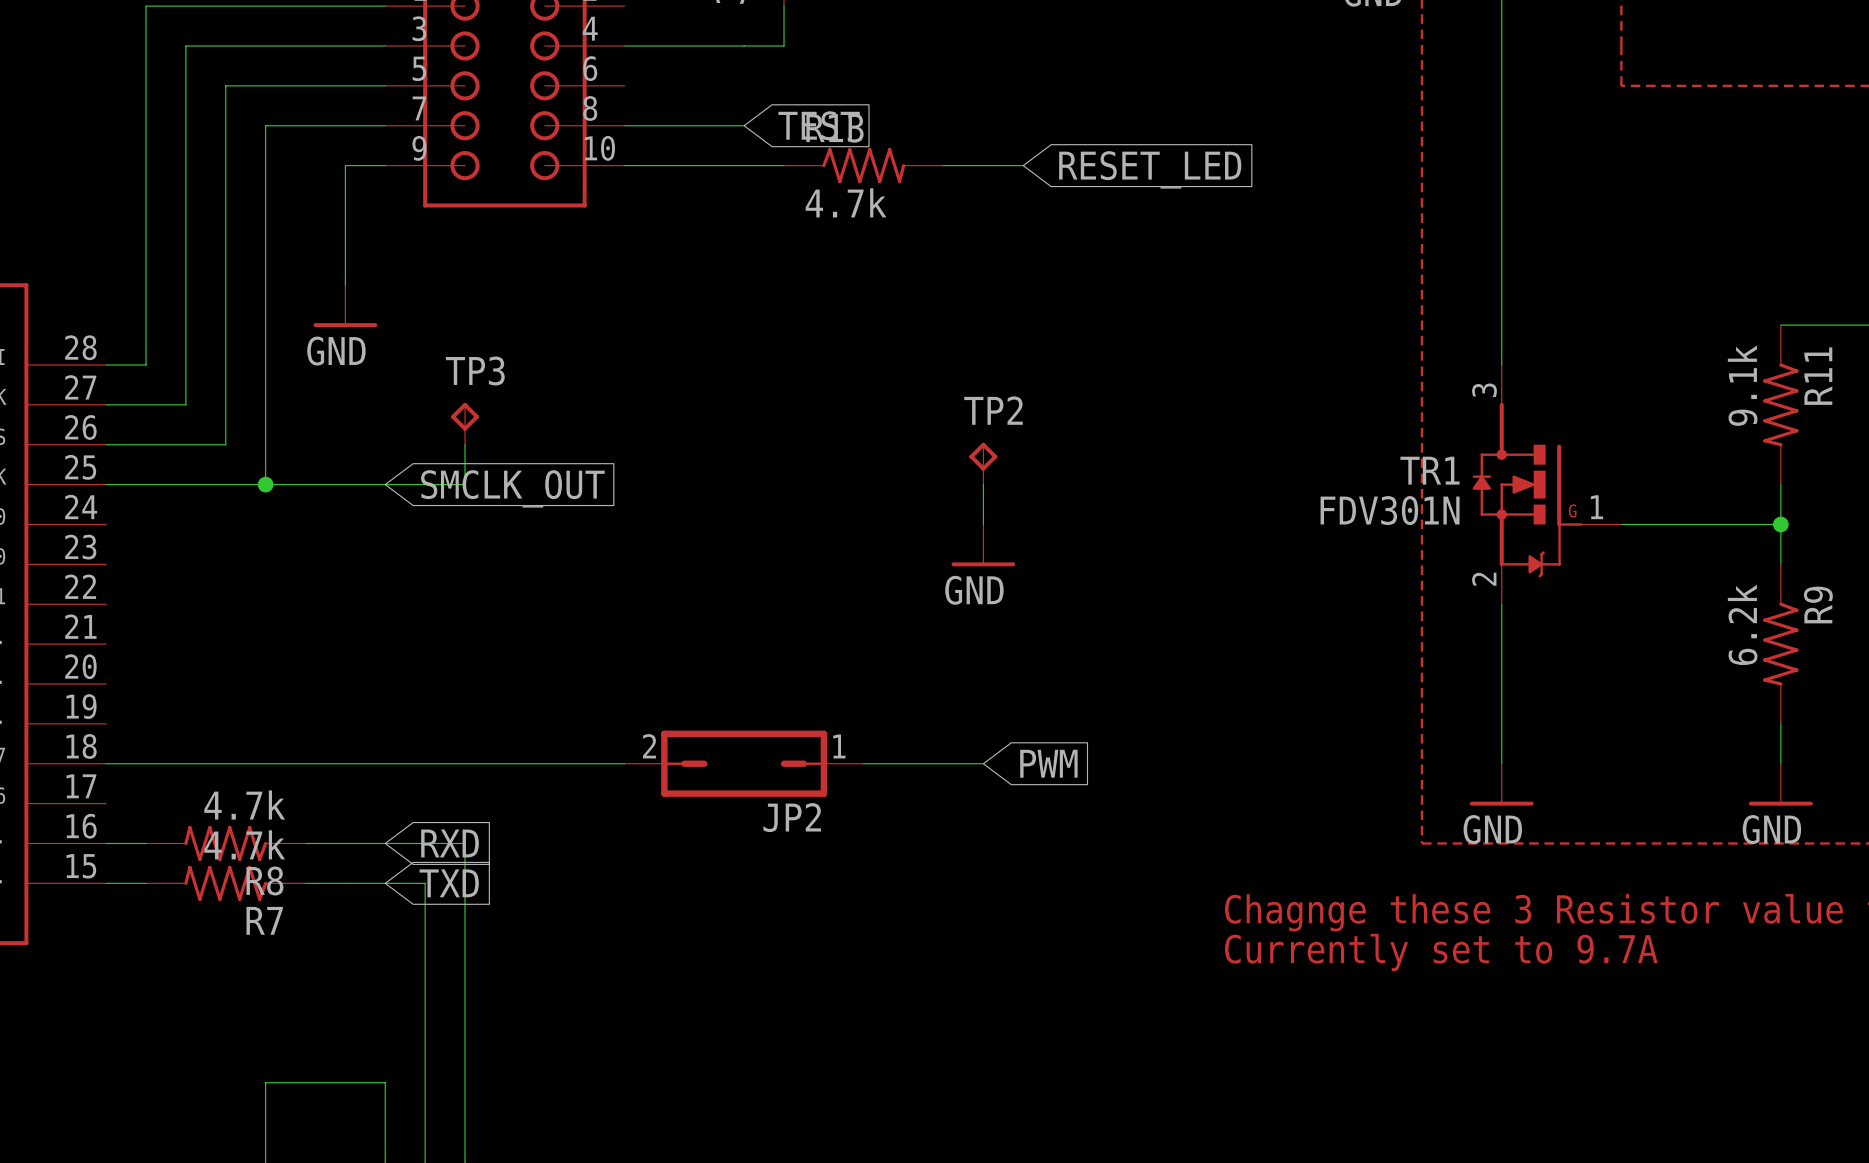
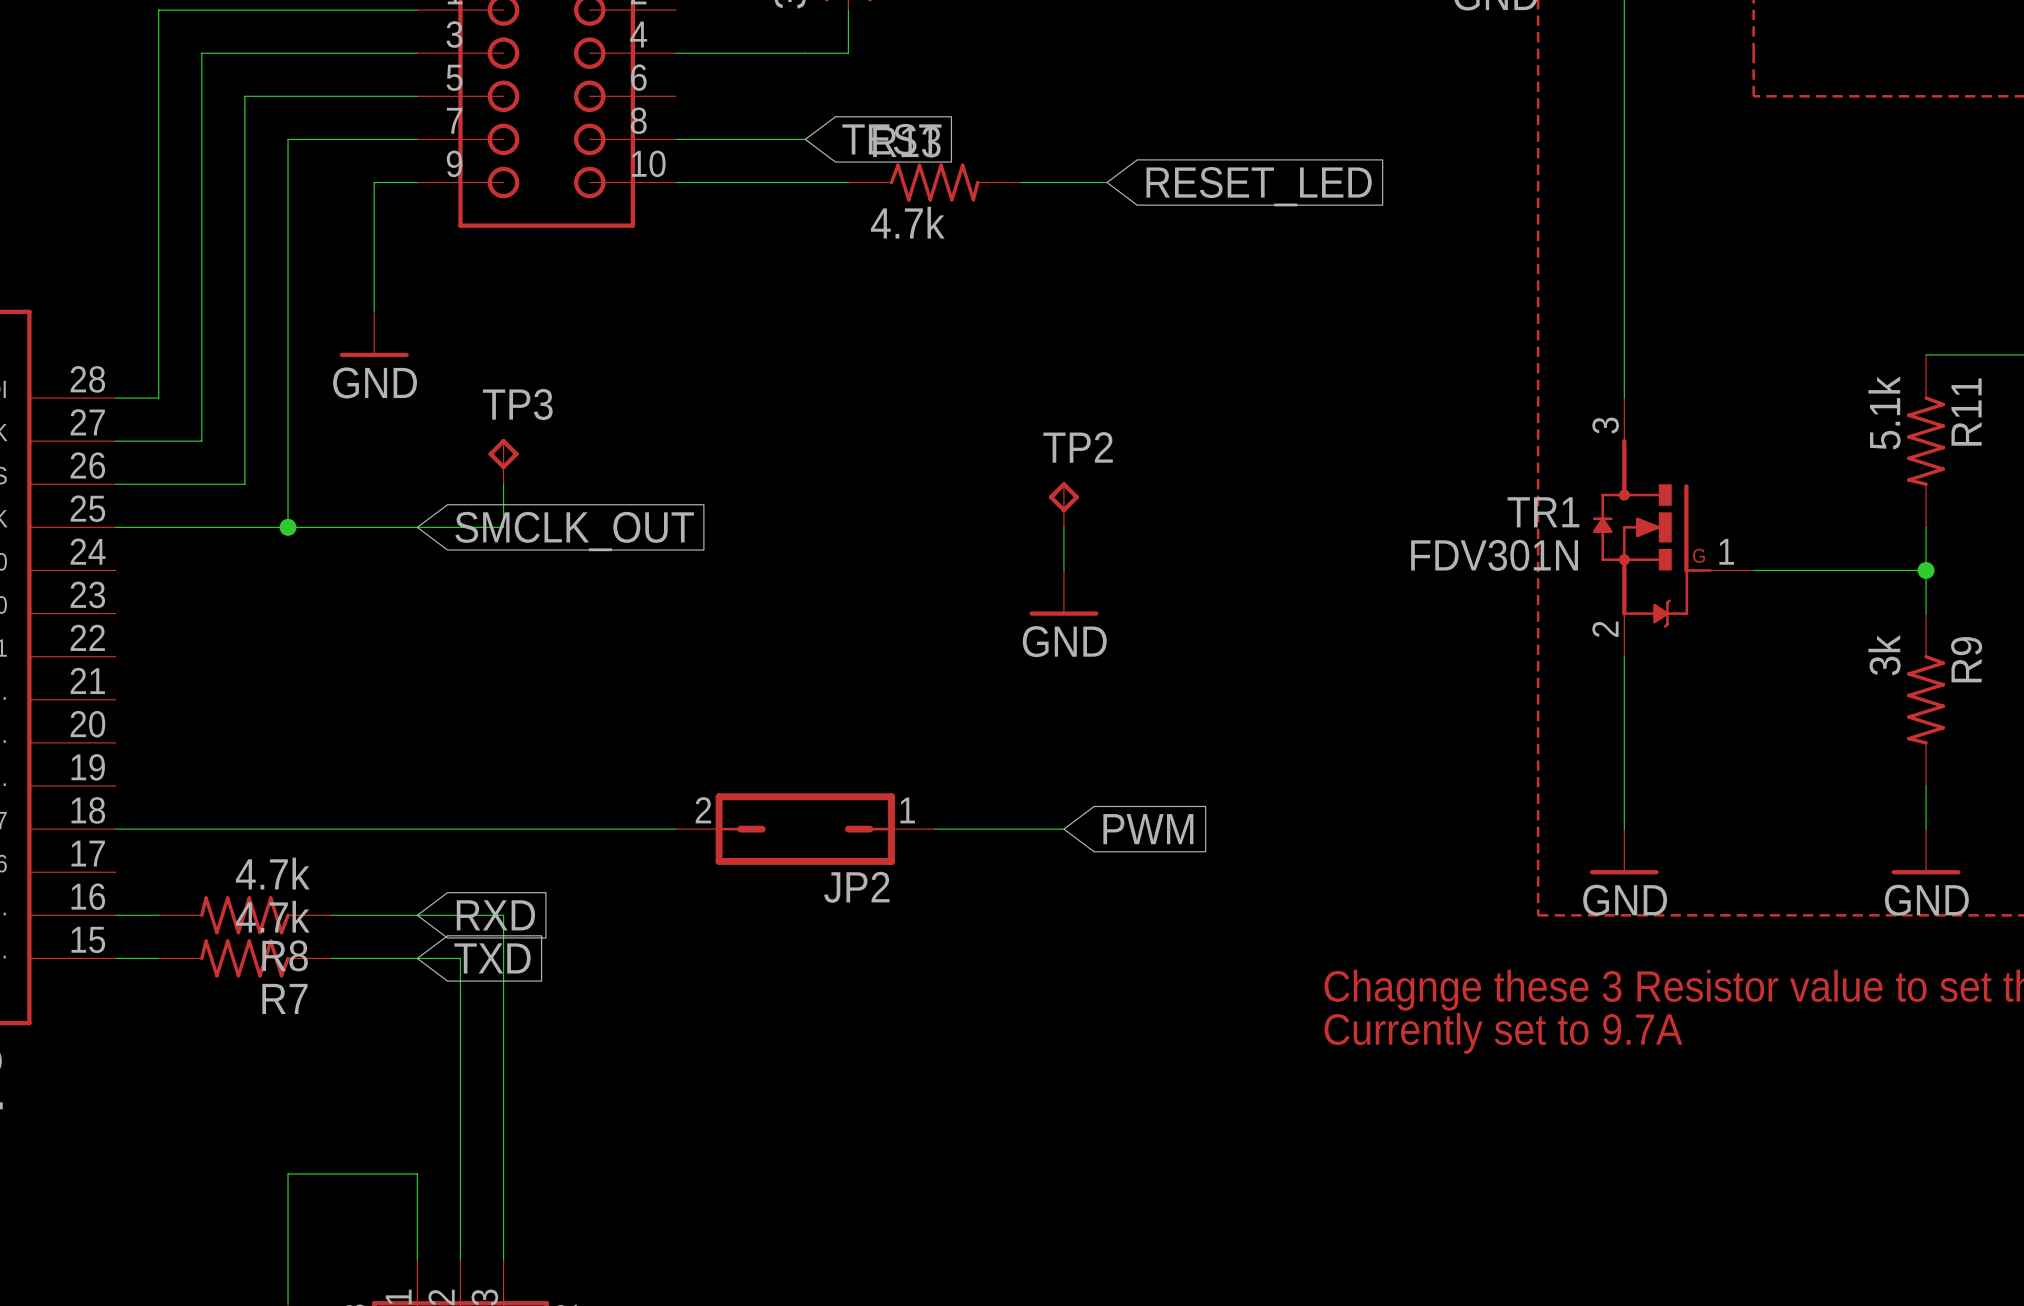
R11 value: 9.1k (1742, 385) -> 5.1k (1884, 412)
R9 value: 6.2k (1742, 624) -> 3k (1884, 655)

